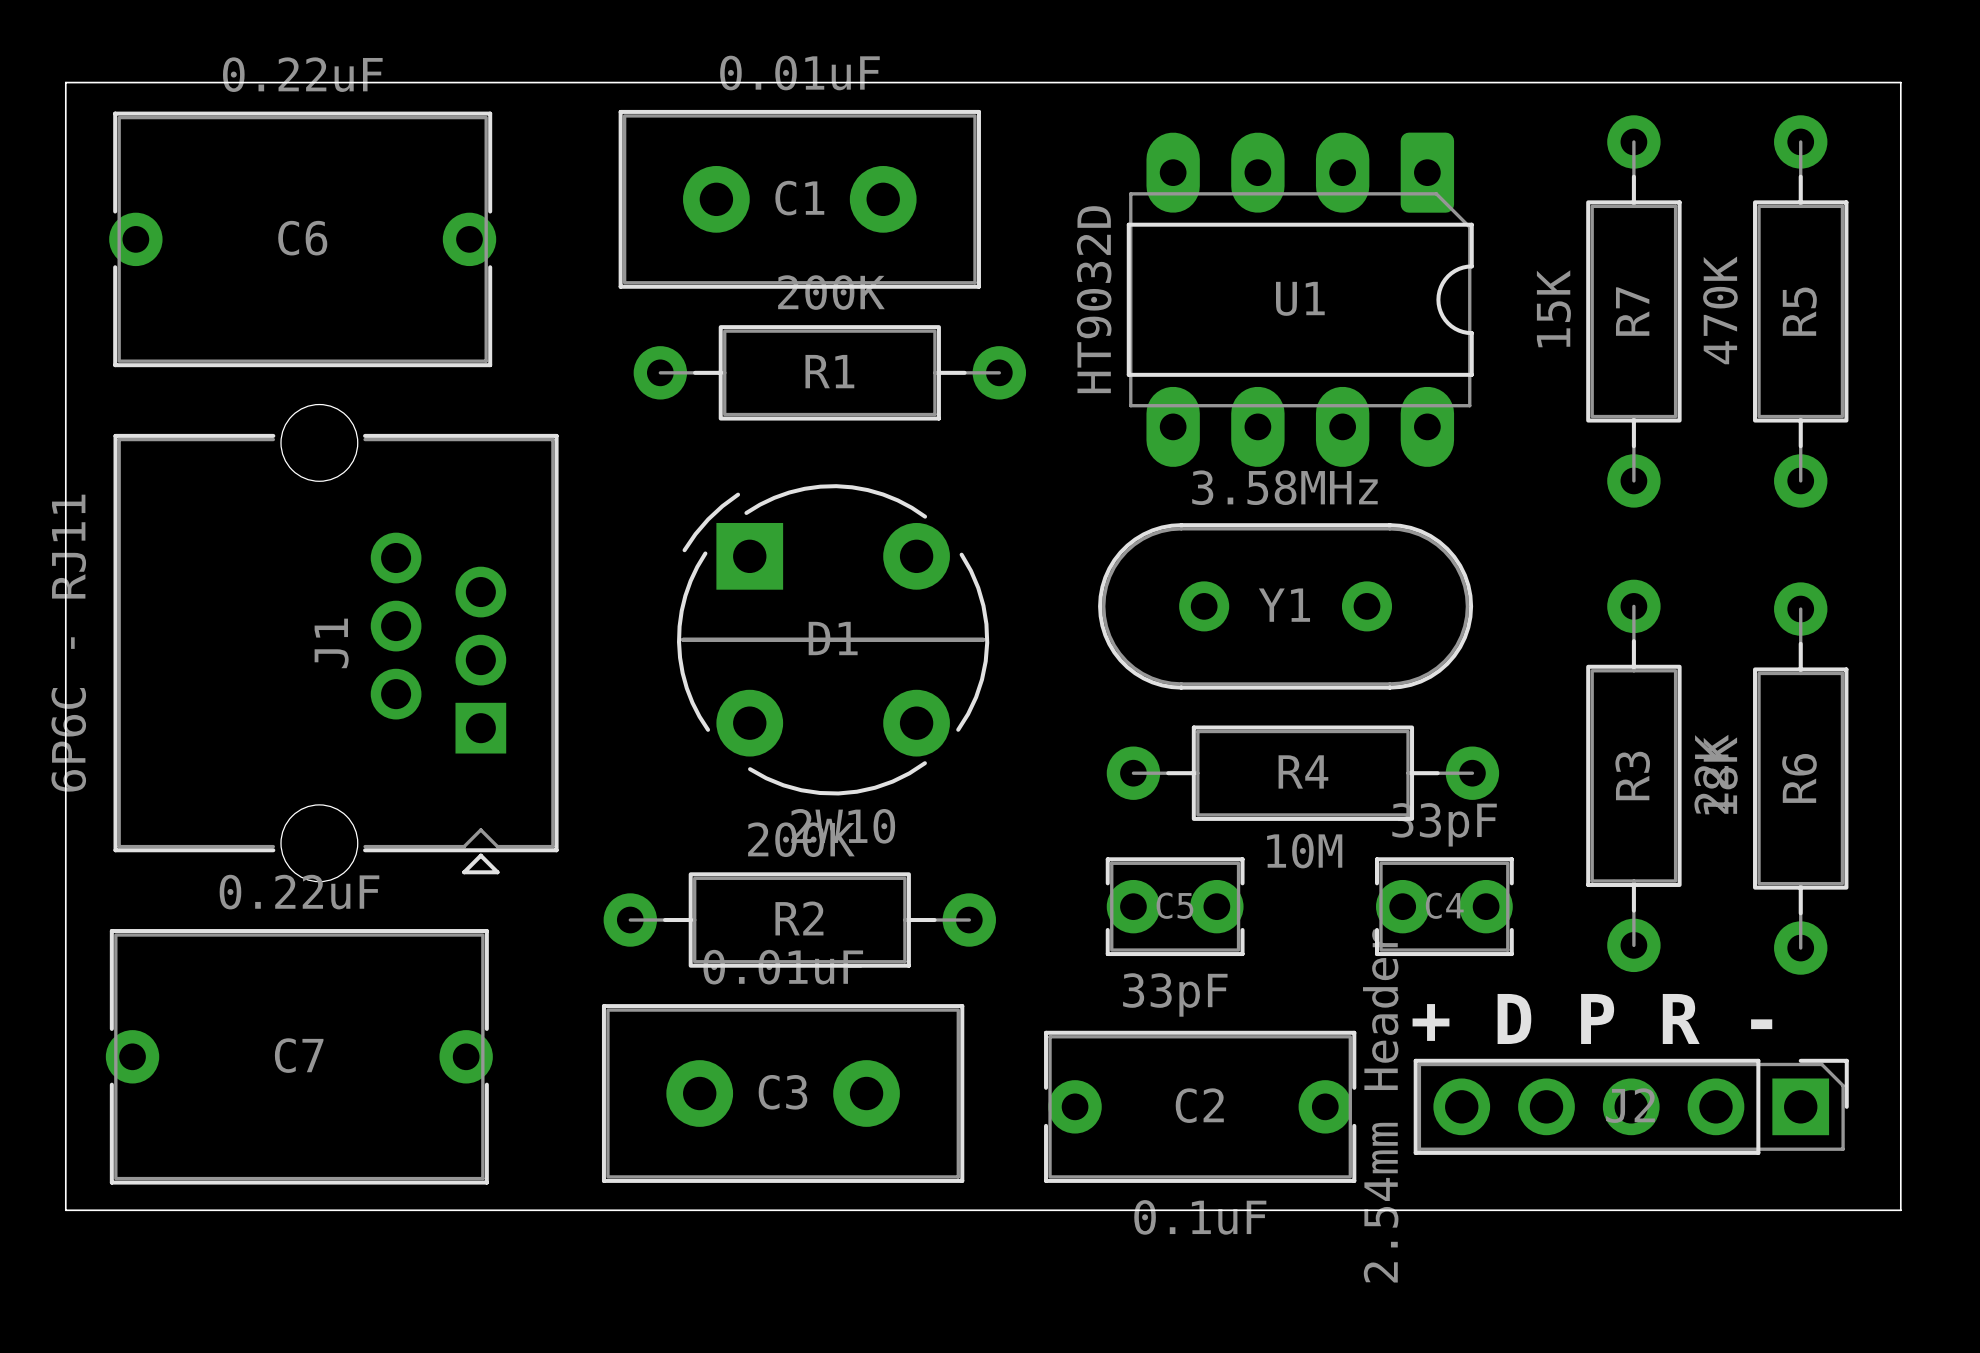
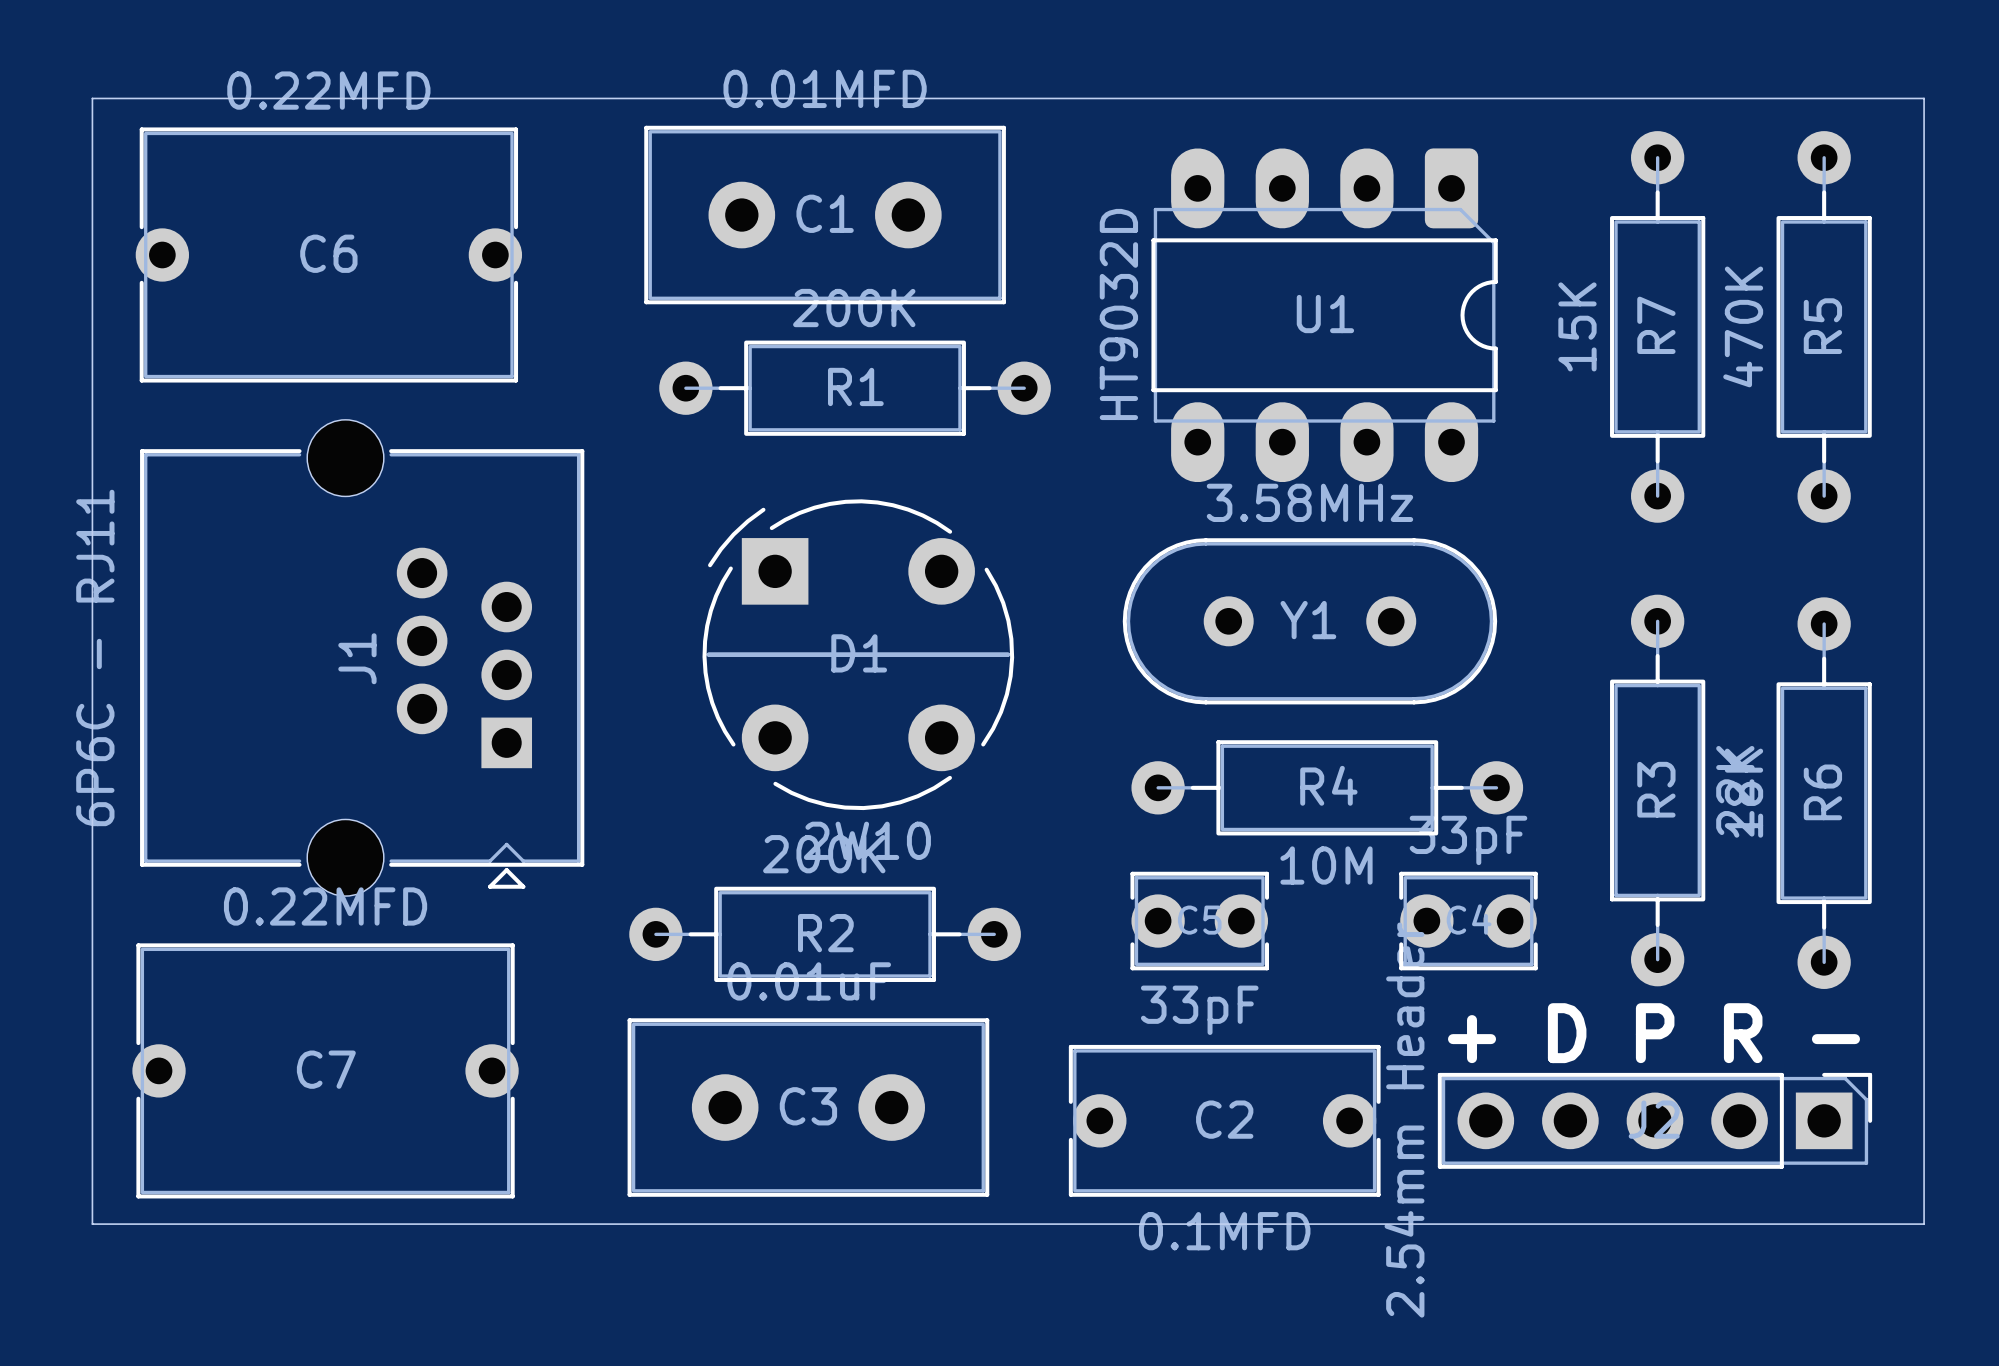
C1 value: 0.01uF (799, 73) -> 0.01MFD (825, 88)
C6 value: 0.22uF (302, 74) -> 0.22MFD (328, 90)
C7 value: 0.22uF (299, 892) -> 0.22MFD (325, 906)
C2 value: 0.1uF (1200, 1217) -> 0.1MFD (1224, 1231)

